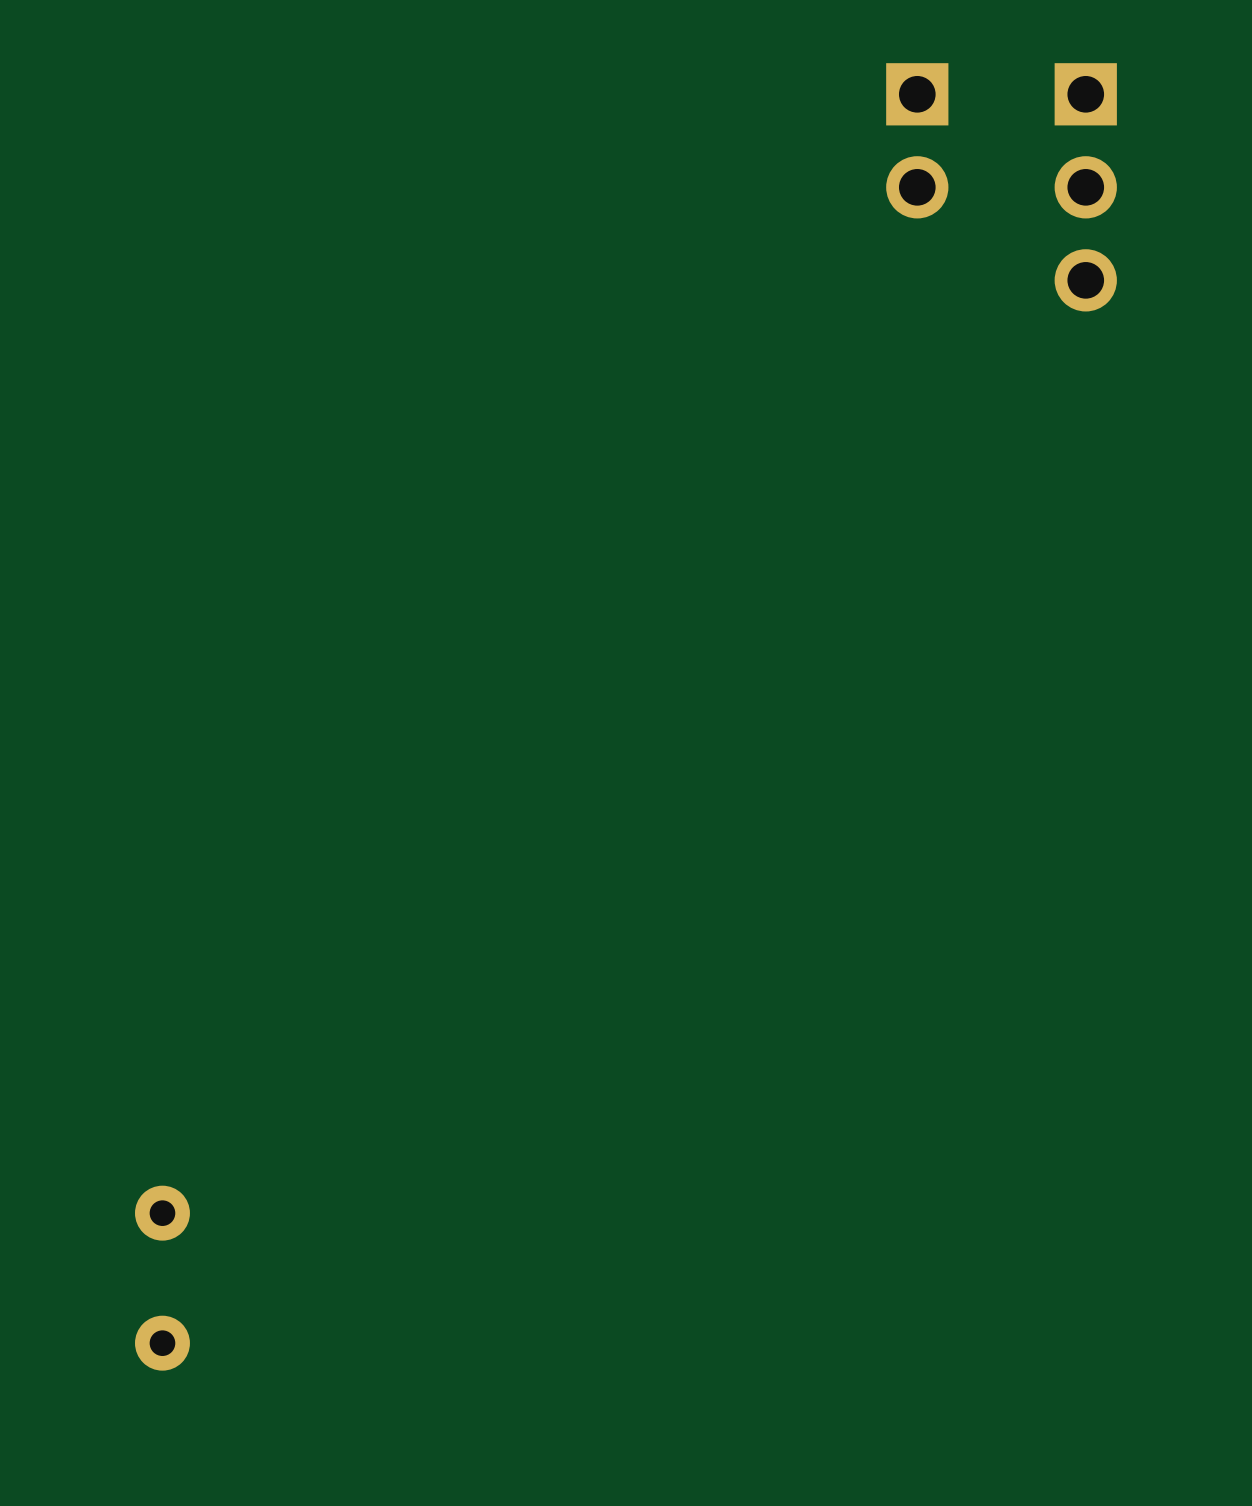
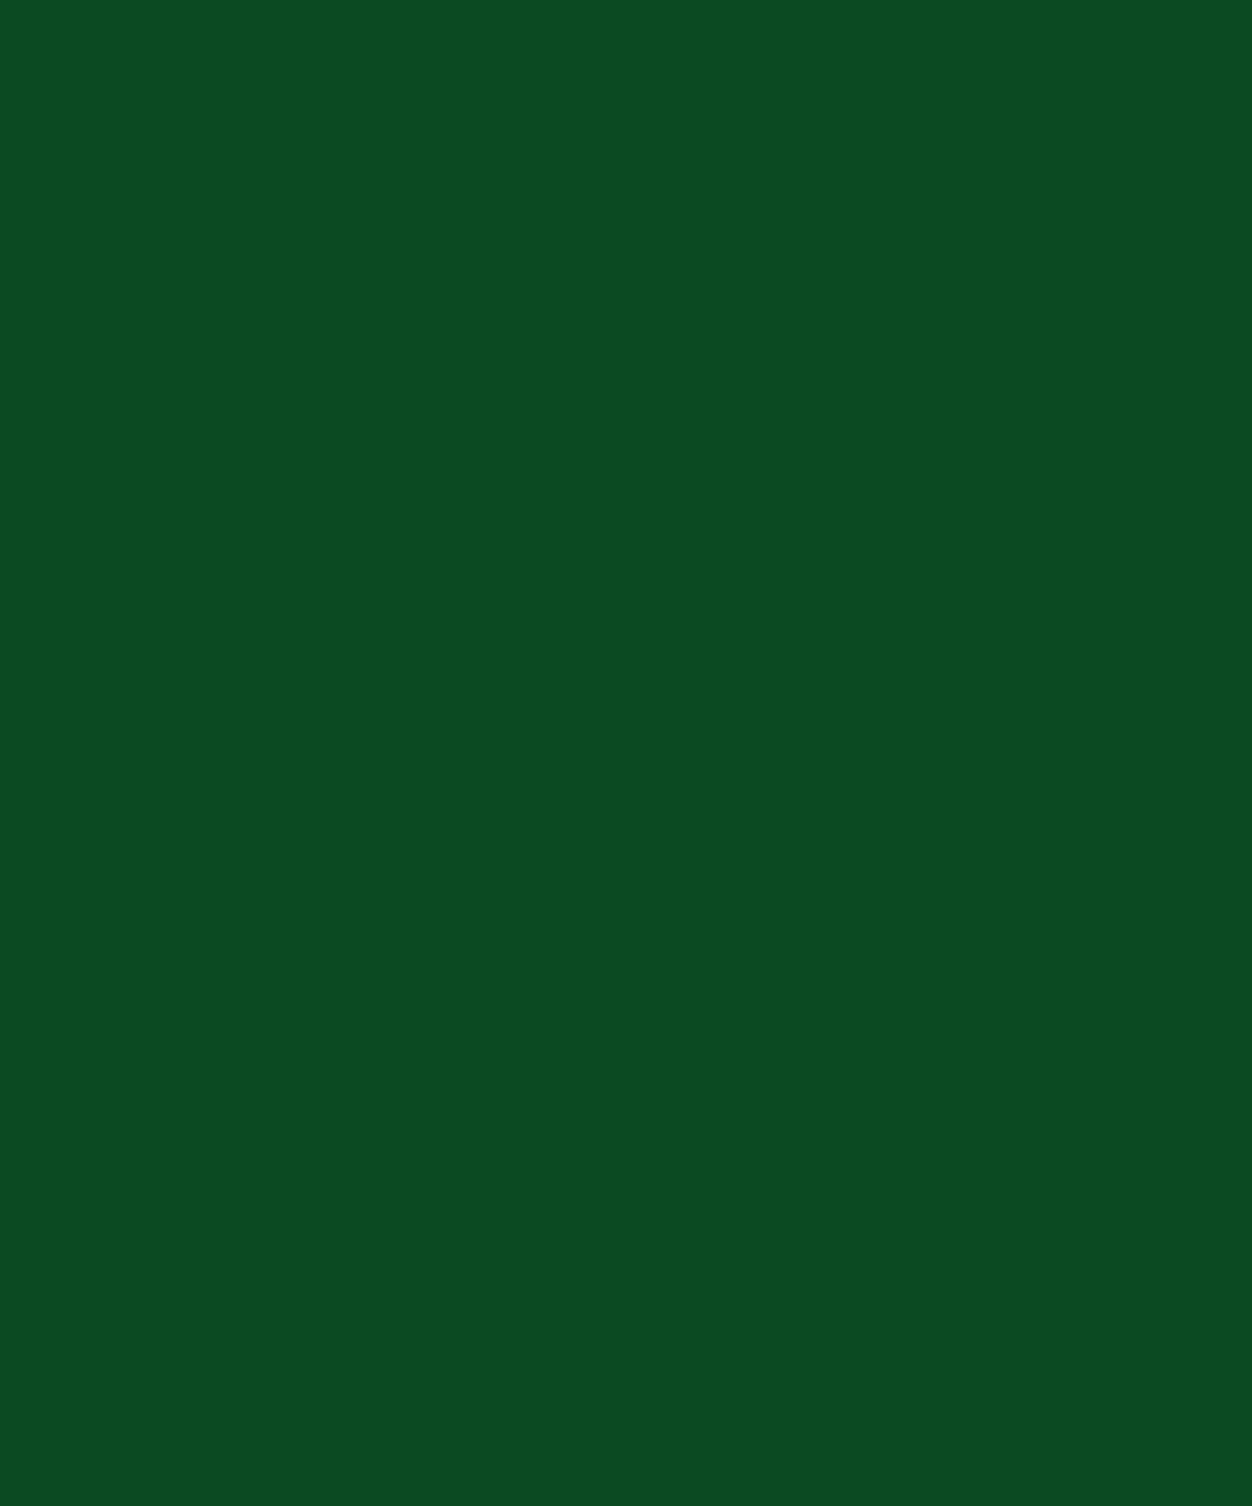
part: (917, 140) -> none
part: (1085, 187) -> none
part: (162, 1213) -> none
part: (162, 1343) -> none

